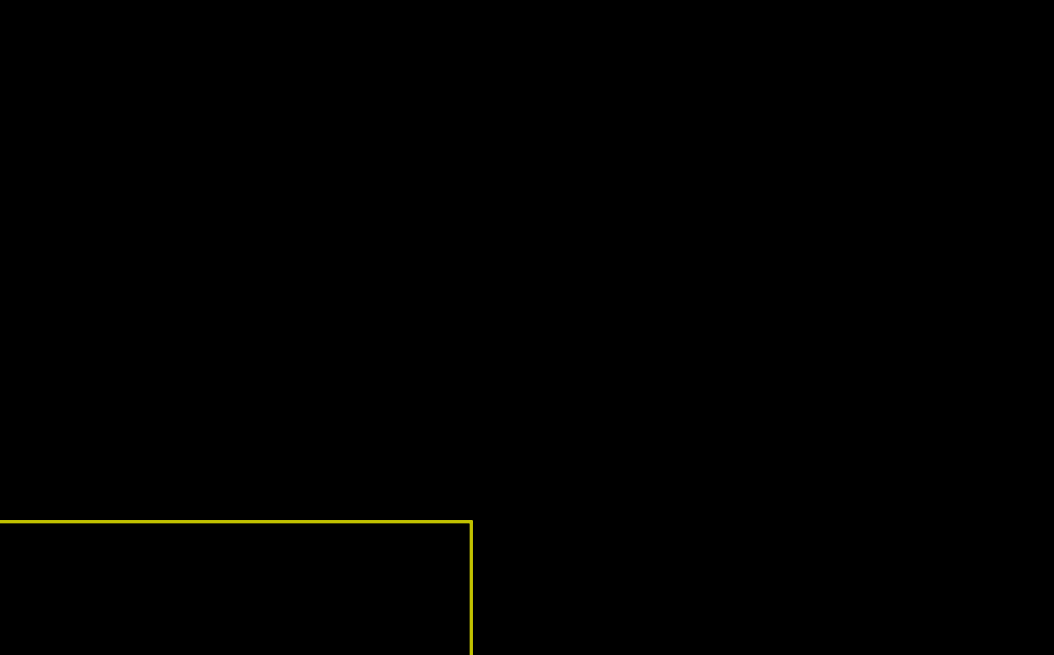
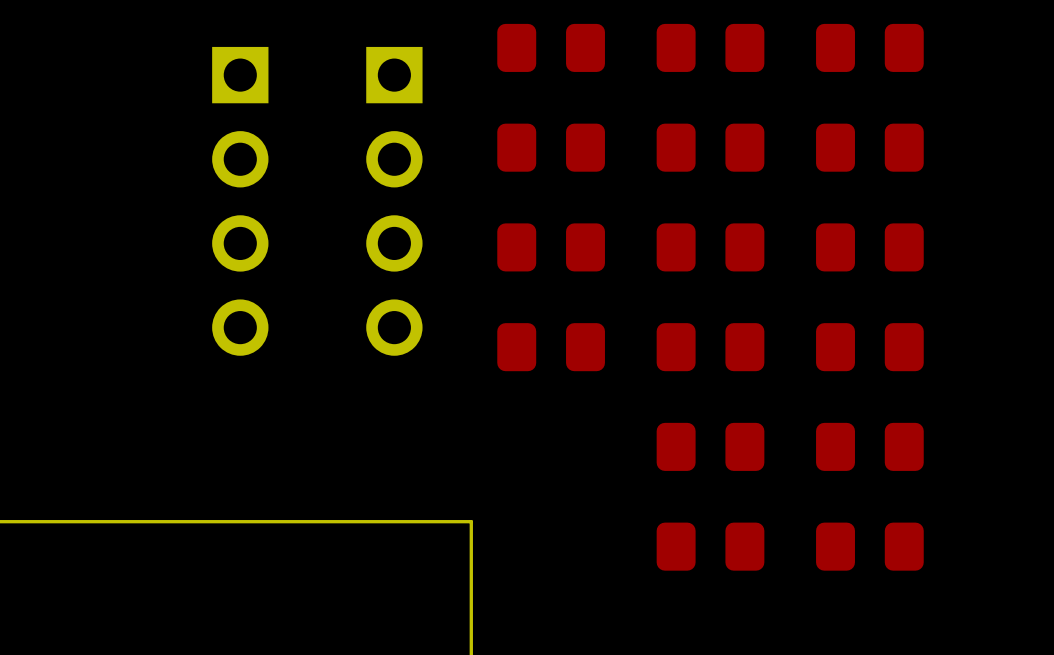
part: none -> (551, 47)
part: none -> (710, 47)
part: none -> (869, 47)
part: none -> (551, 147)
part: none -> (710, 147)
part: none -> (869, 147)
part: none -> (240, 201)
part: none -> (394, 201)
part: none -> (551, 247)
part: none -> (710, 247)
part: none -> (869, 247)
part: none -> (551, 347)
part: none -> (710, 347)
part: none -> (869, 347)
part: none -> (710, 446)
part: none -> (869, 446)
part: none -> (710, 546)
part: none -> (869, 546)

